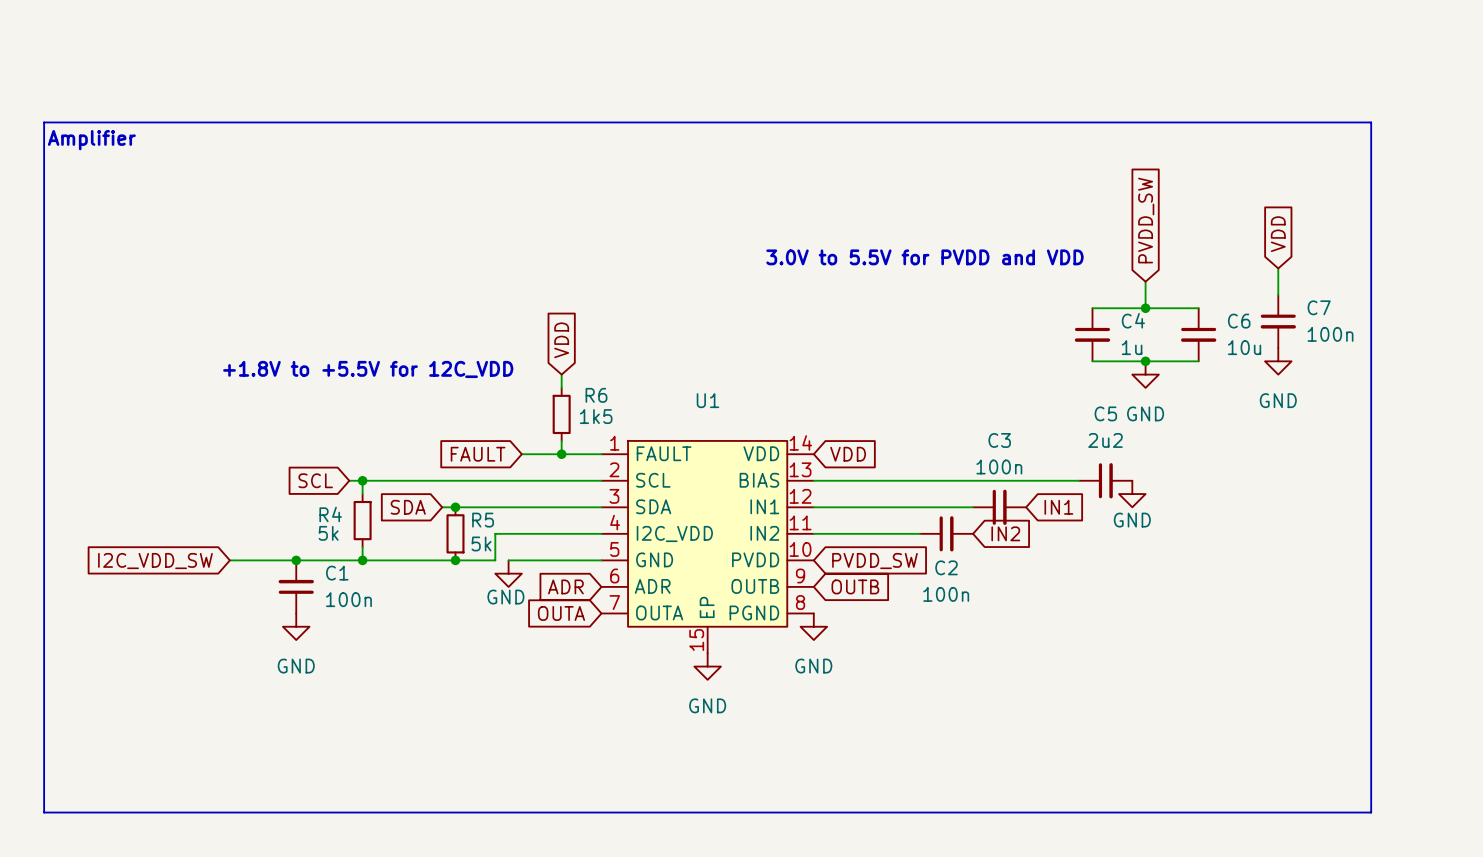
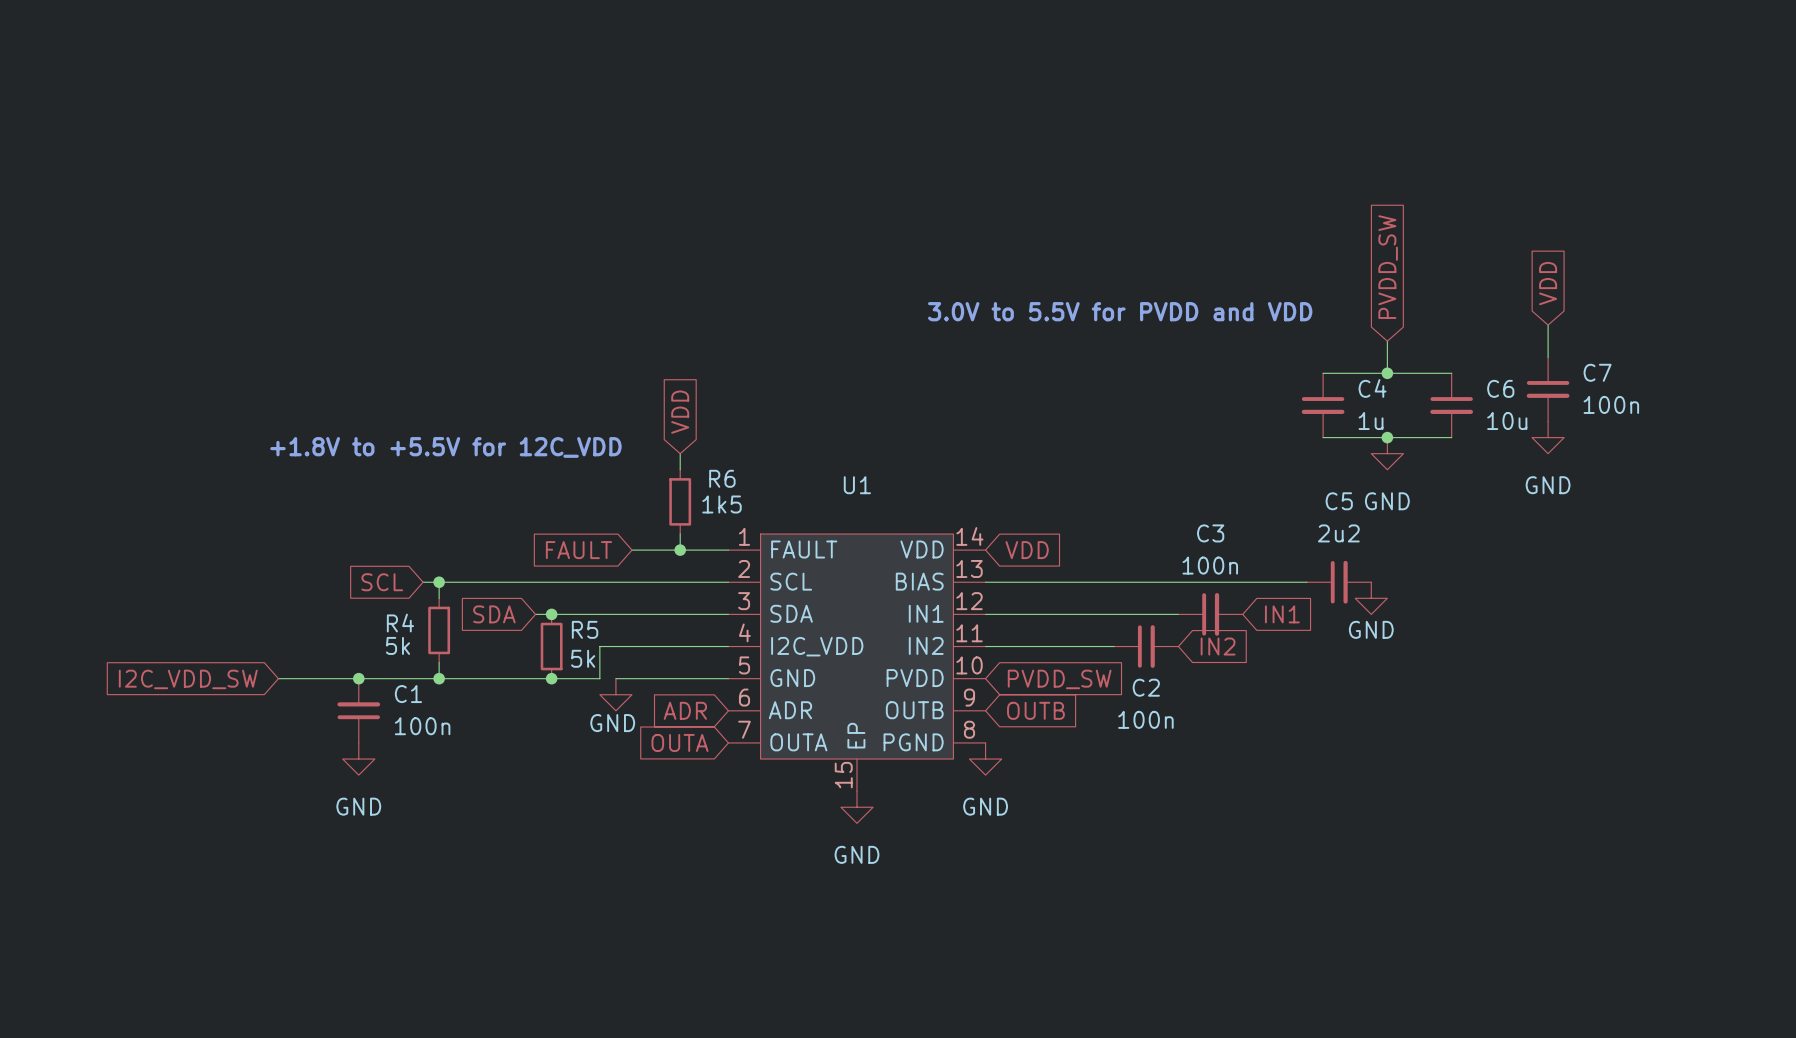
line: (44, 122) (1371, 122) (1371, 812) (44, 812) (44, 122) -> none
text: Amplifier (91, 140) -> none

